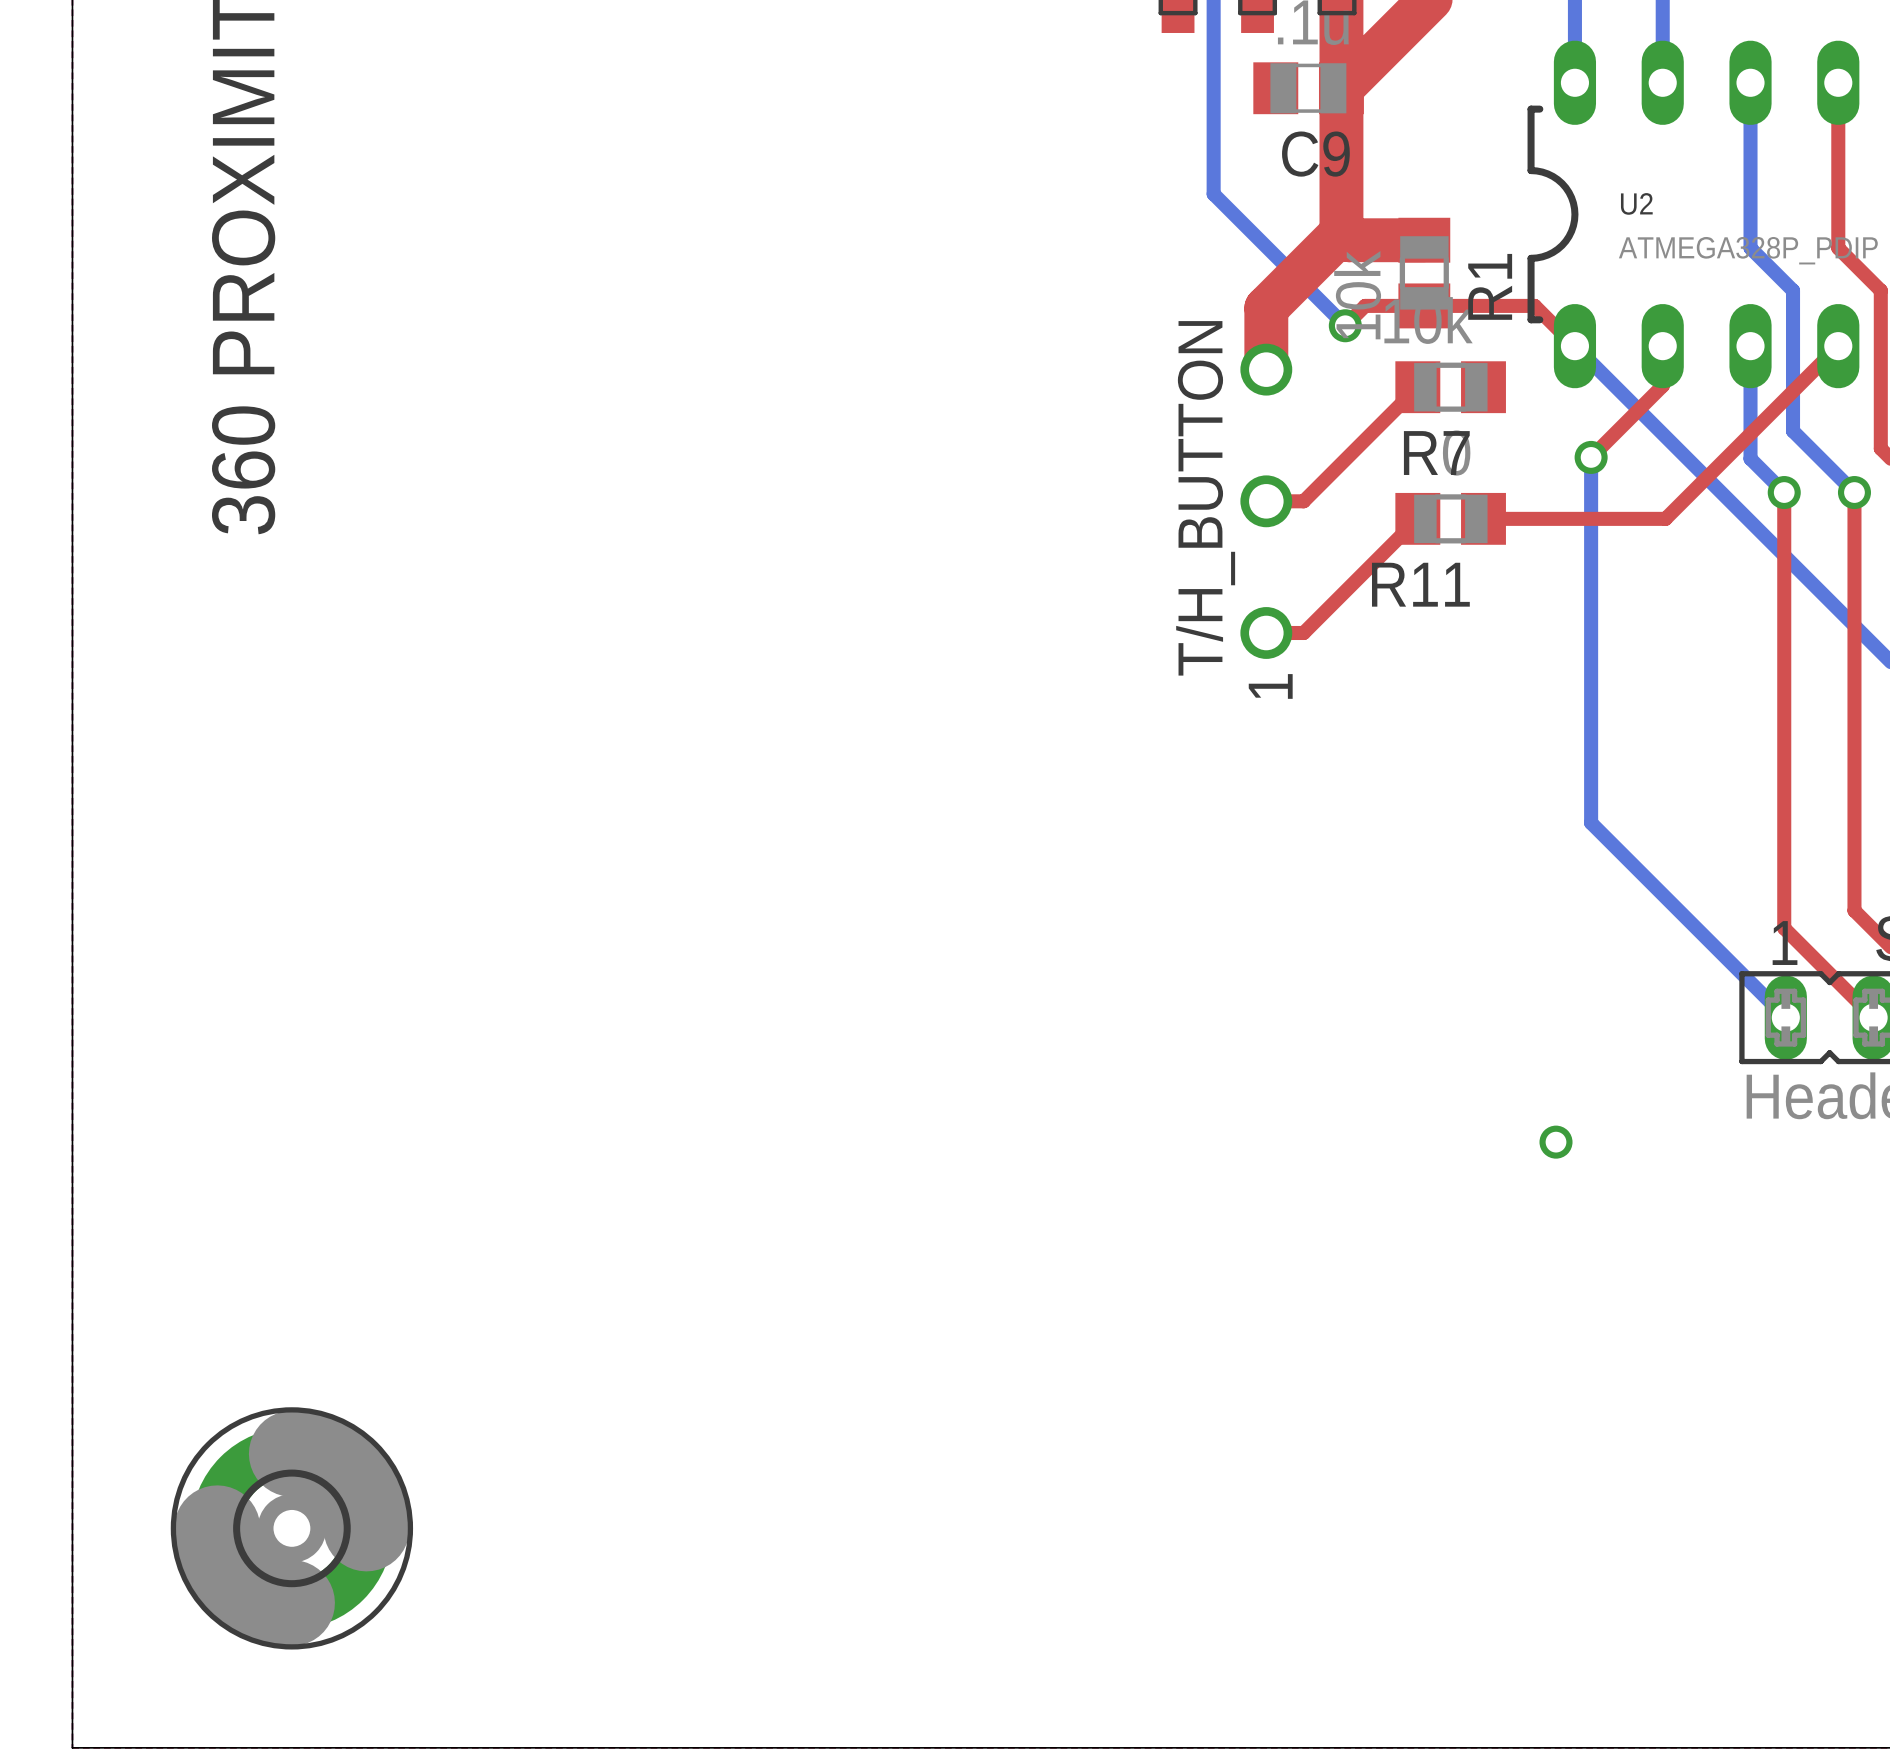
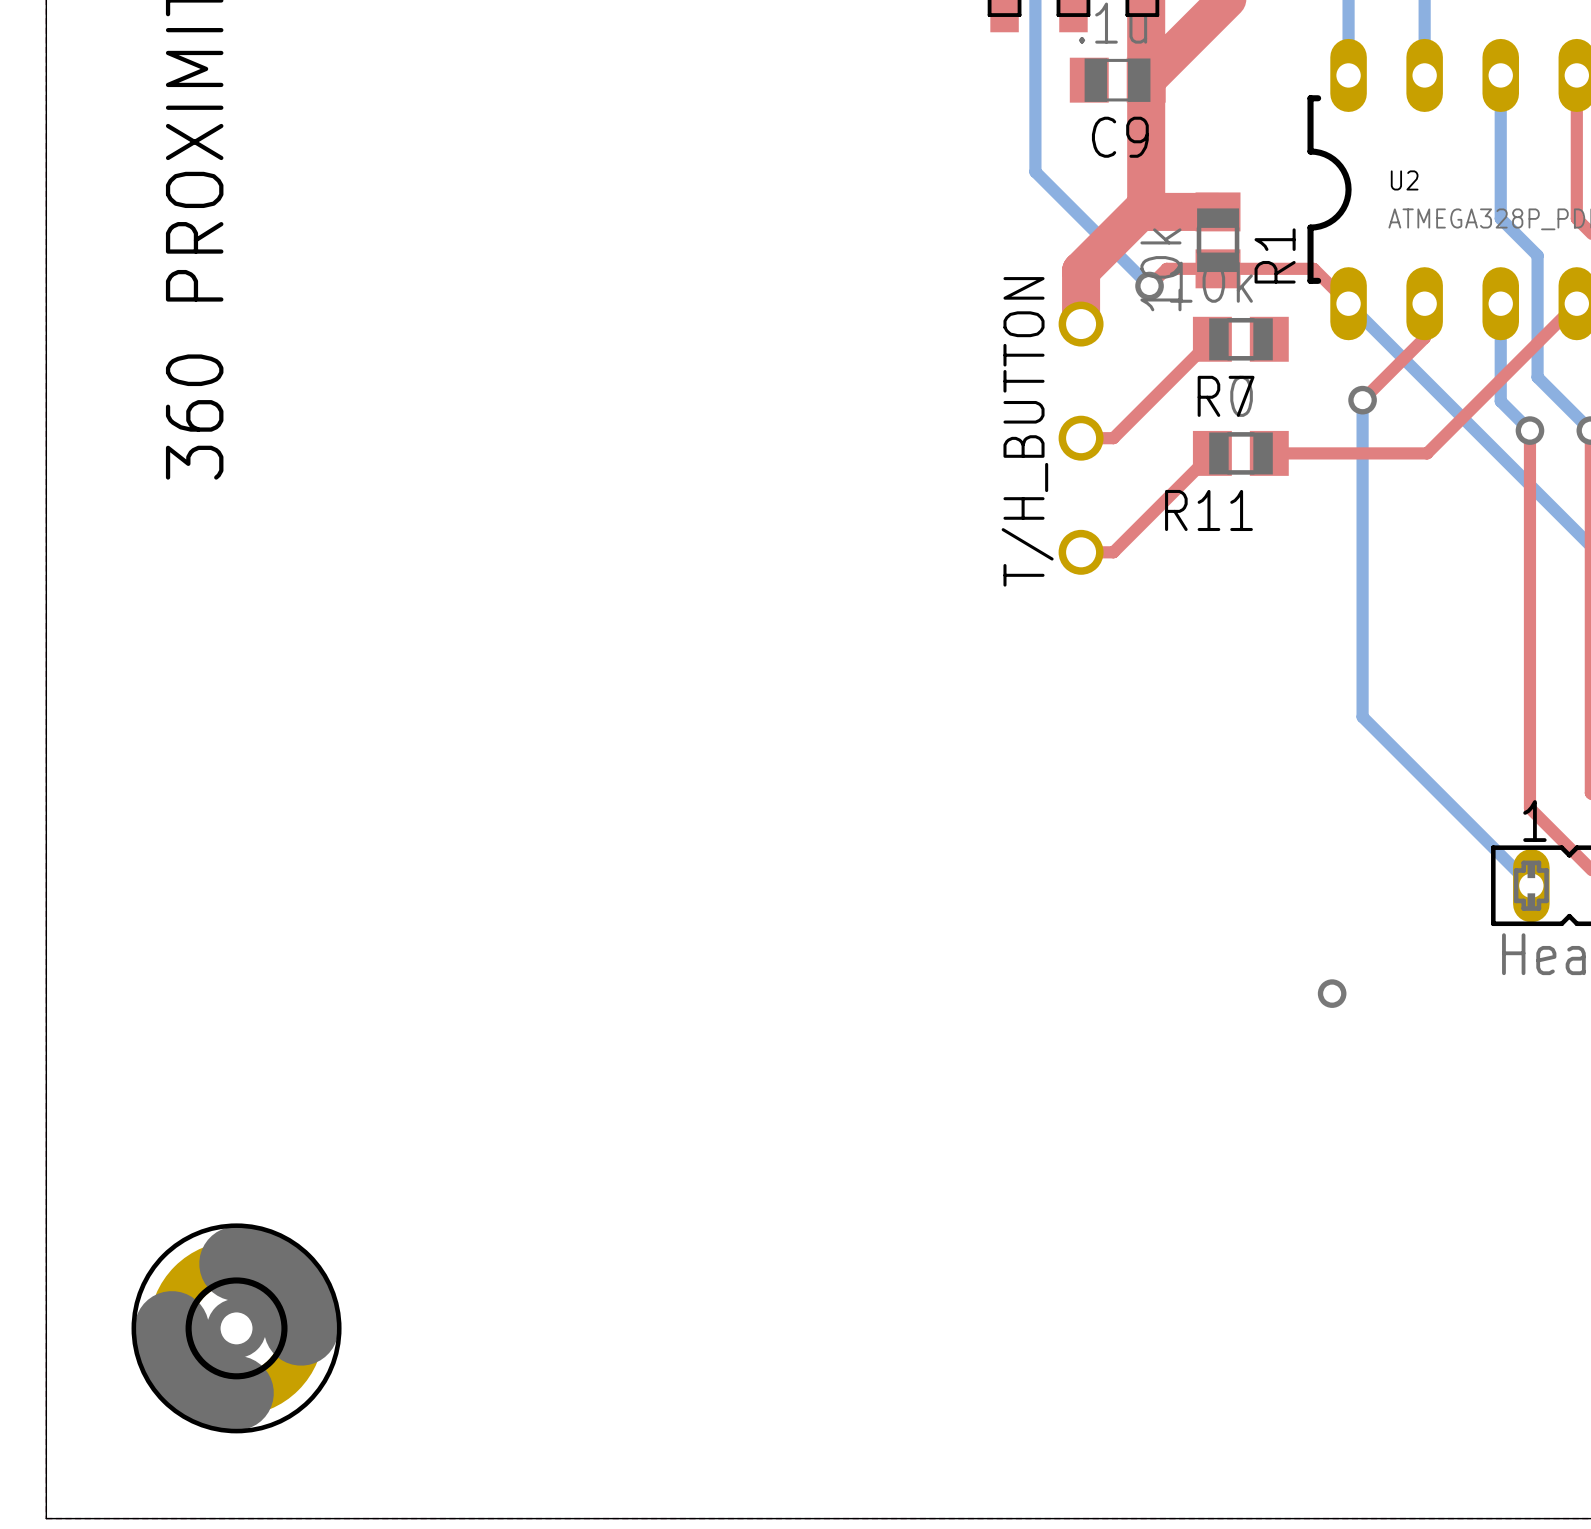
T/H_BUTTON text: 1 (1270, 686) -> none

